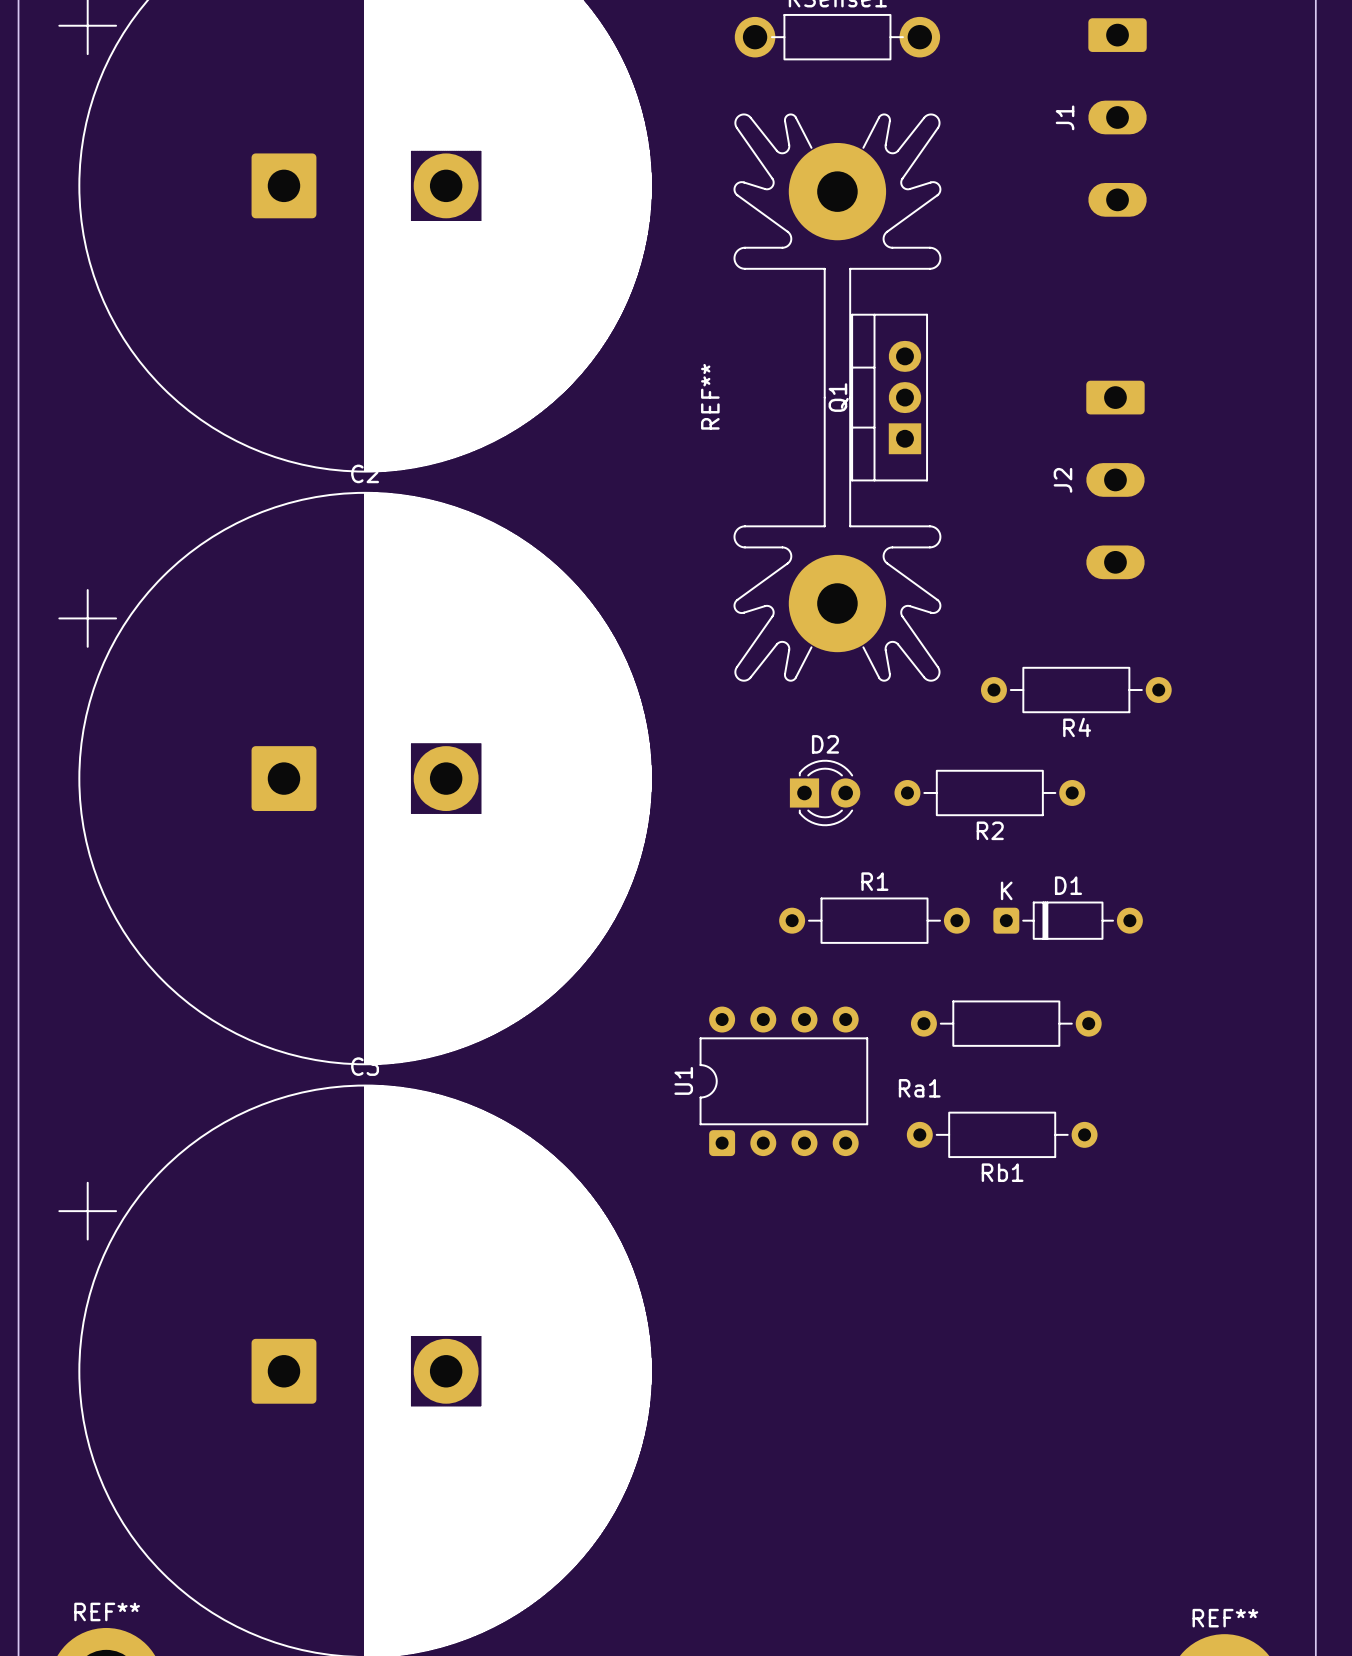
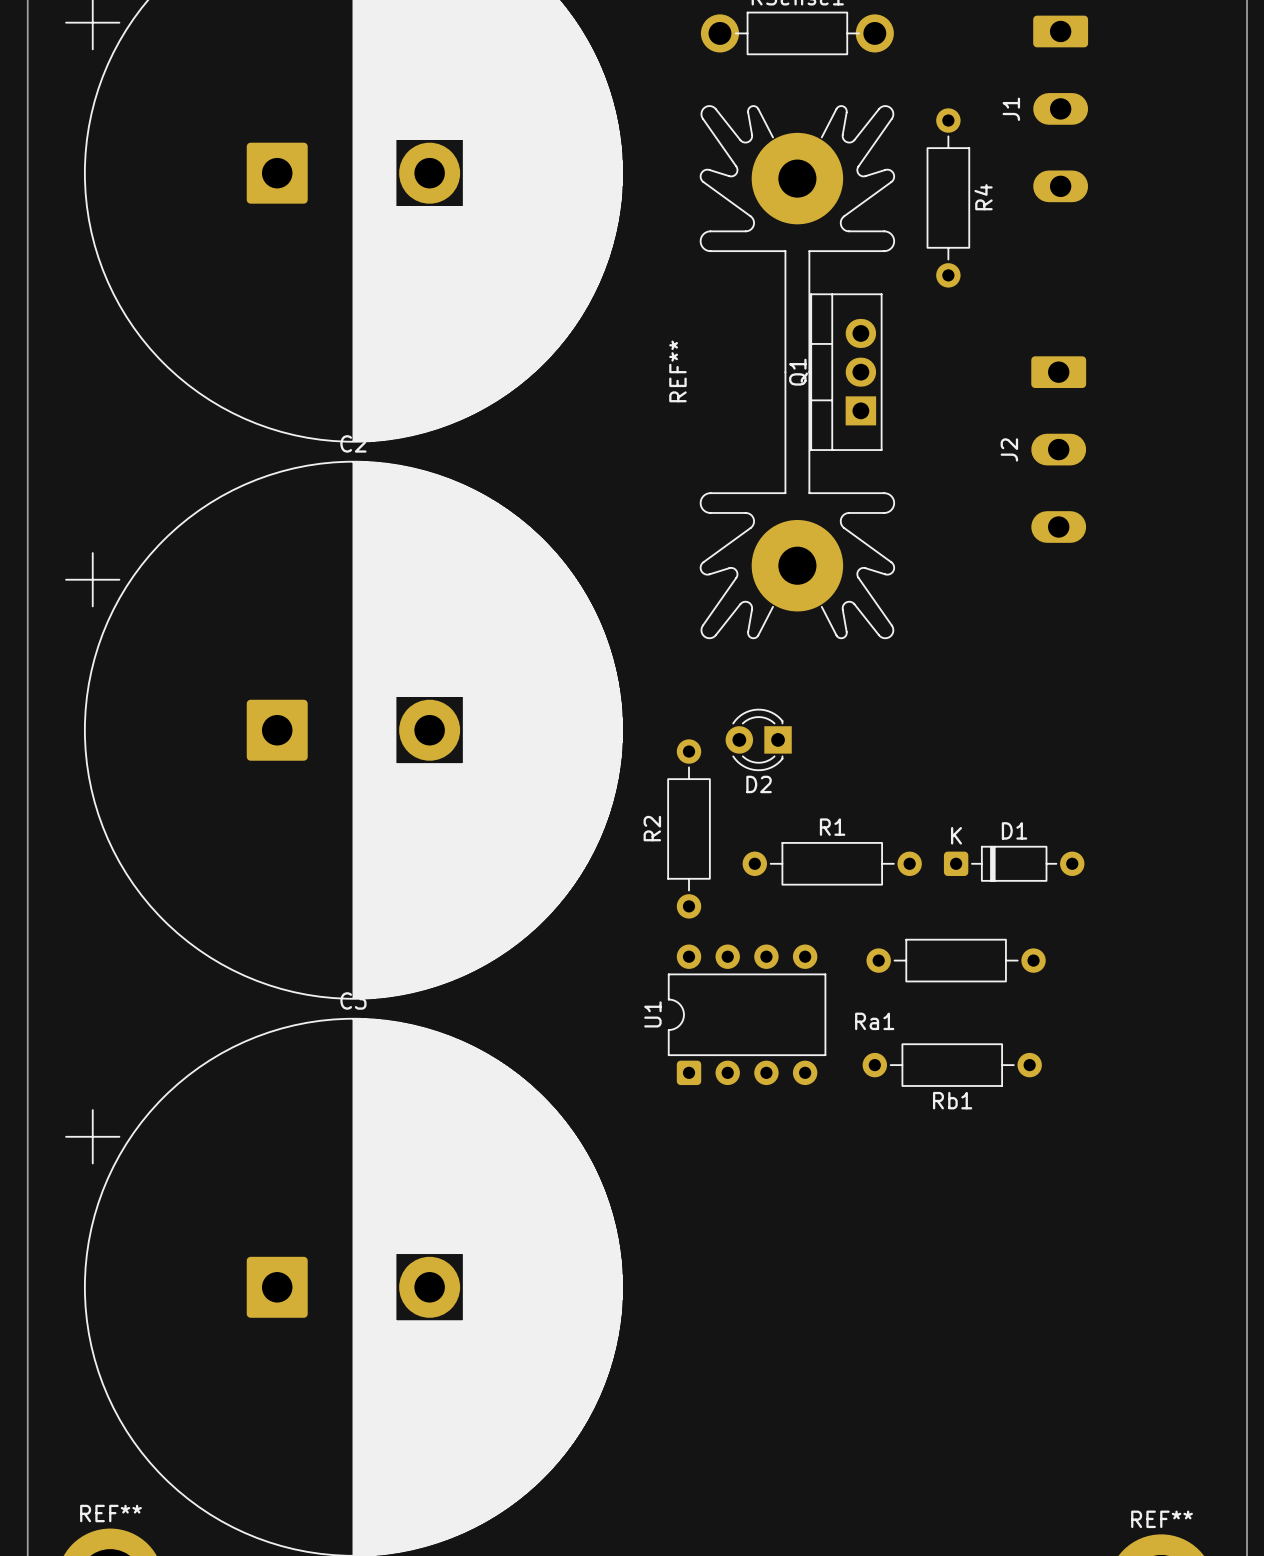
R4 rotation: 0° (1076, 690) -> 90° clockwise (948, 197)
R4 position: (1076, 690) -> (948, 197)
R4 name position: R4 (1077, 727) -> R4 (983, 197)
D2 rotation: 0° (825, 792) -> 180° (758, 739)
R2 rotation: 0° (989, 792) -> 90° clockwise (689, 828)
R2 position: (989, 792) -> (689, 828)

